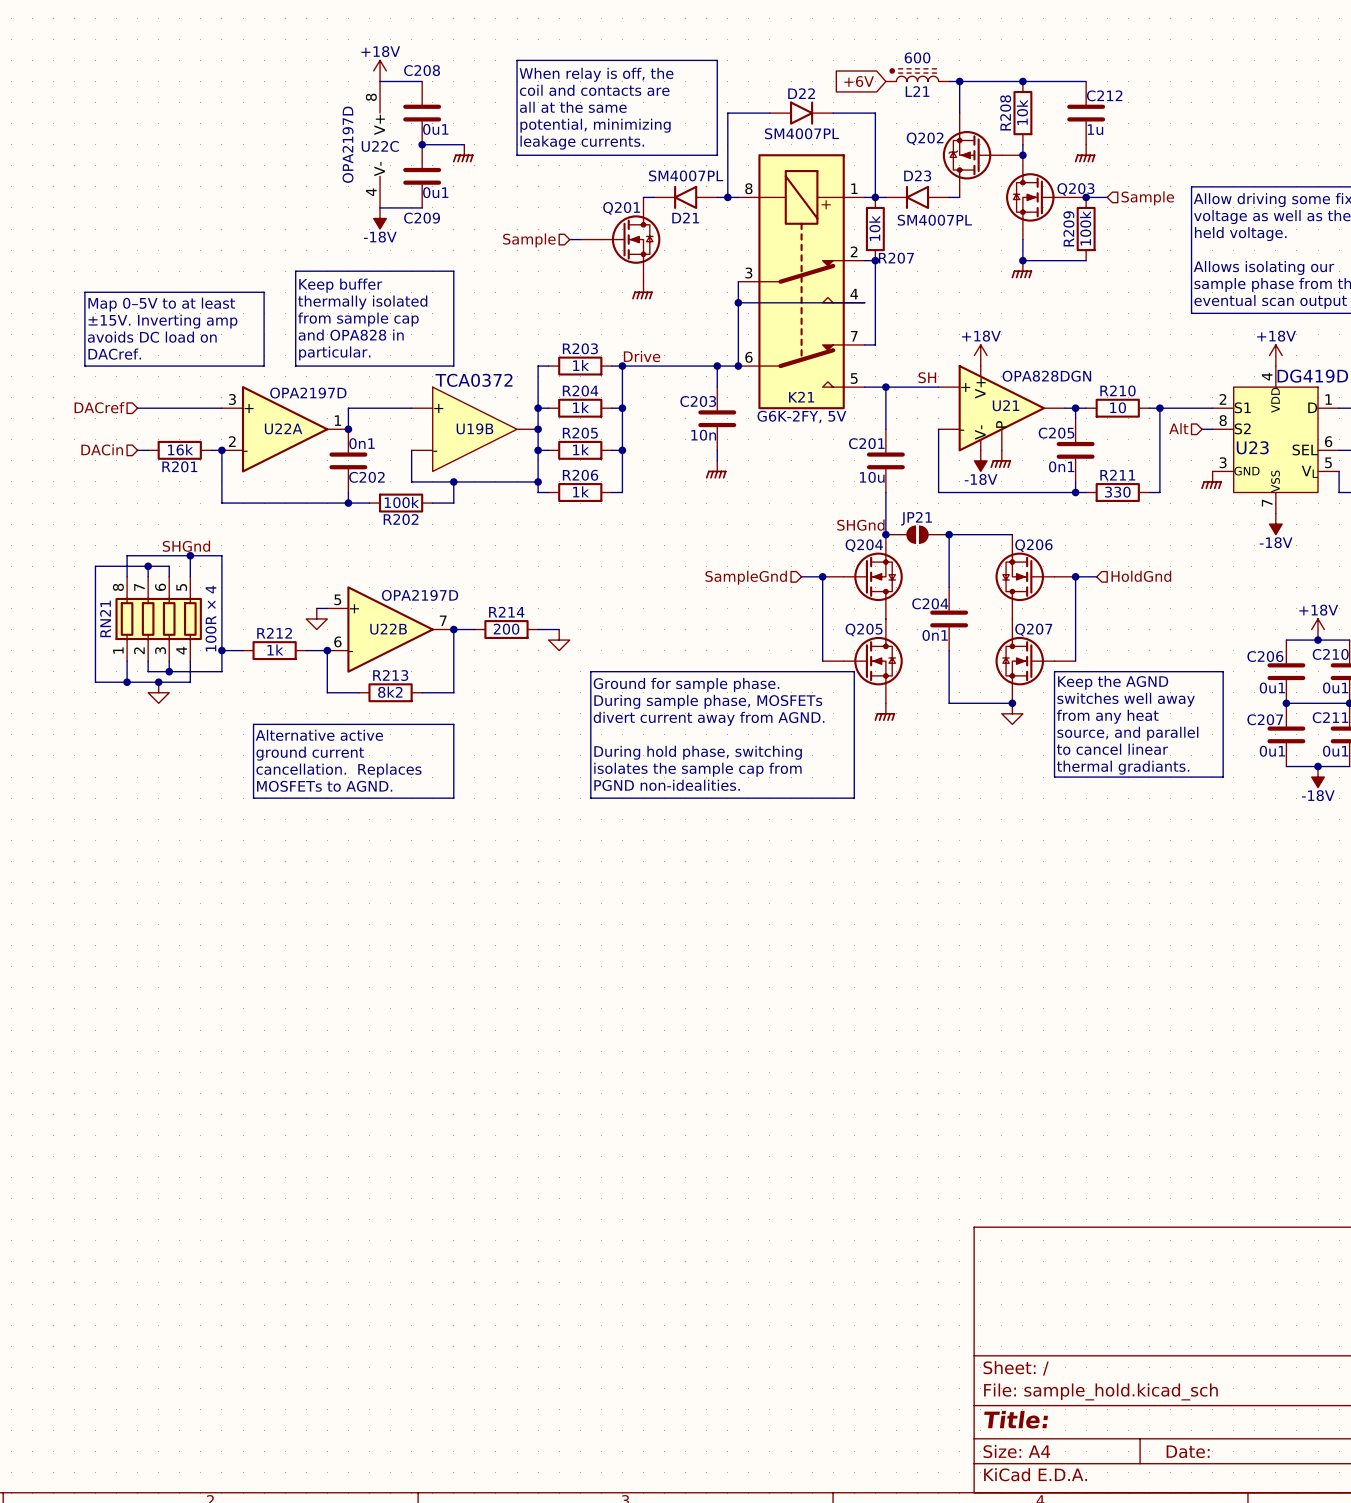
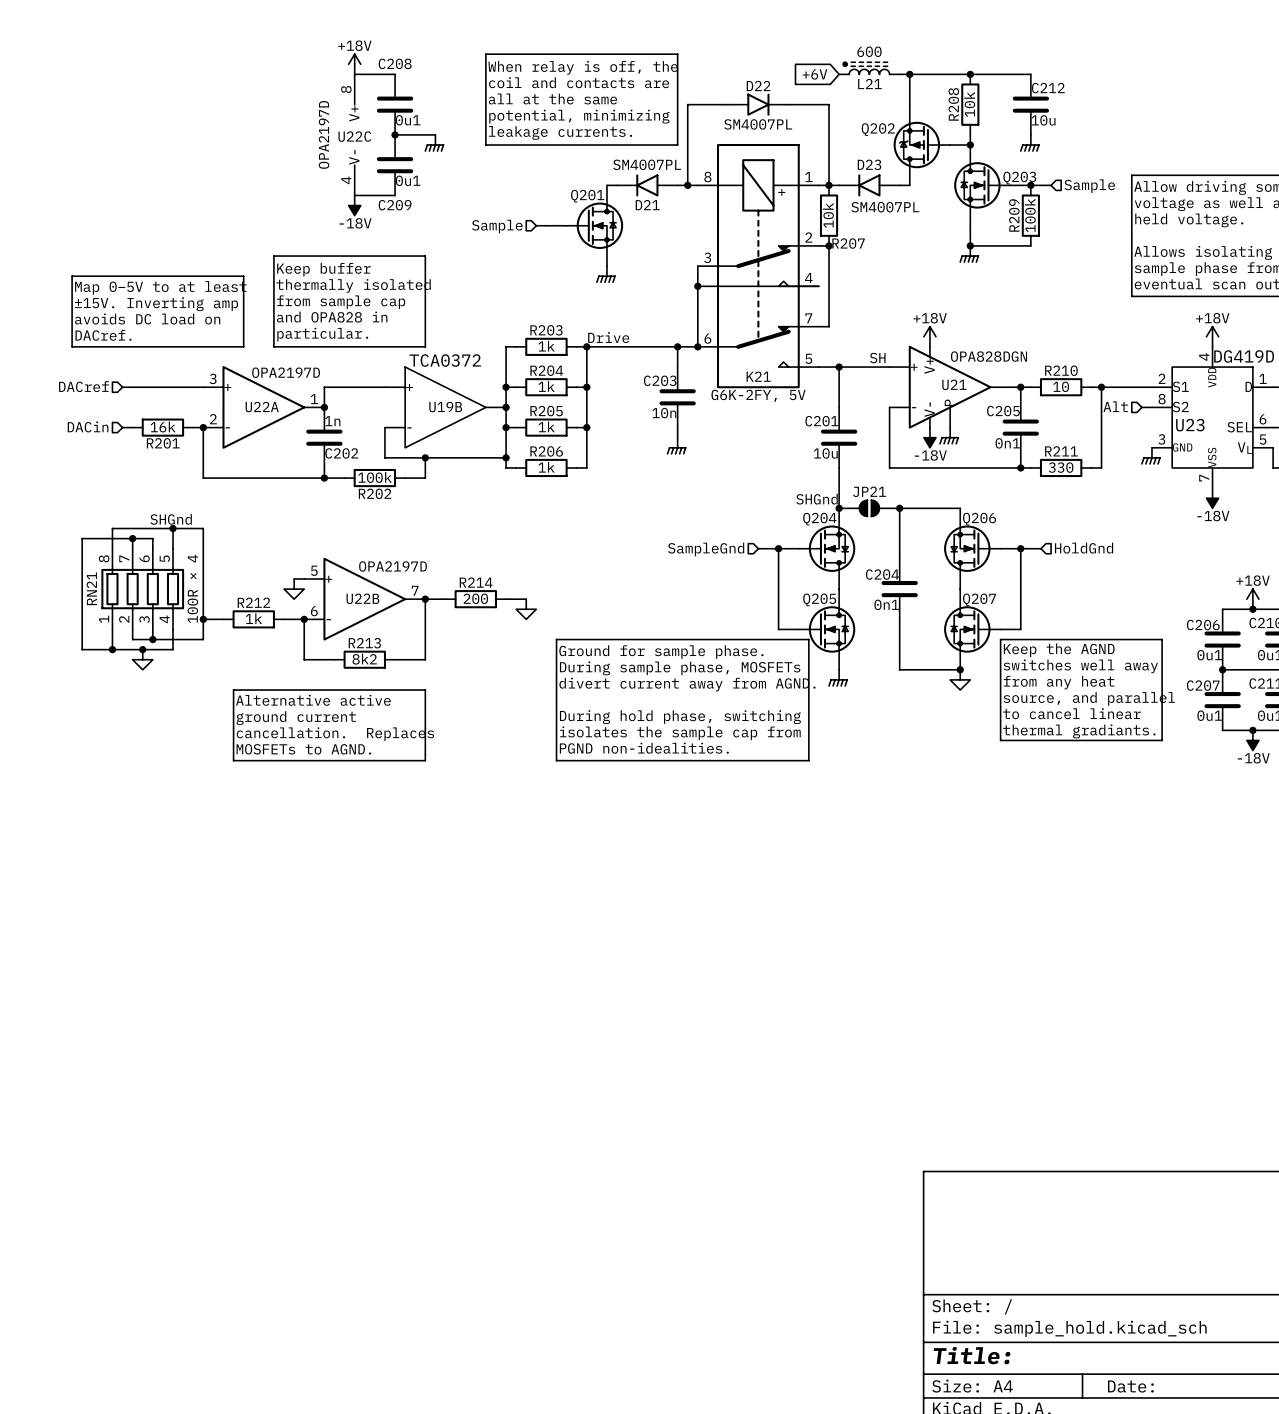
C212 value: 1u (1095, 129) -> 10u (1043, 120)
C202 value: 0n1 (361, 443) -> 1n (332, 421)

